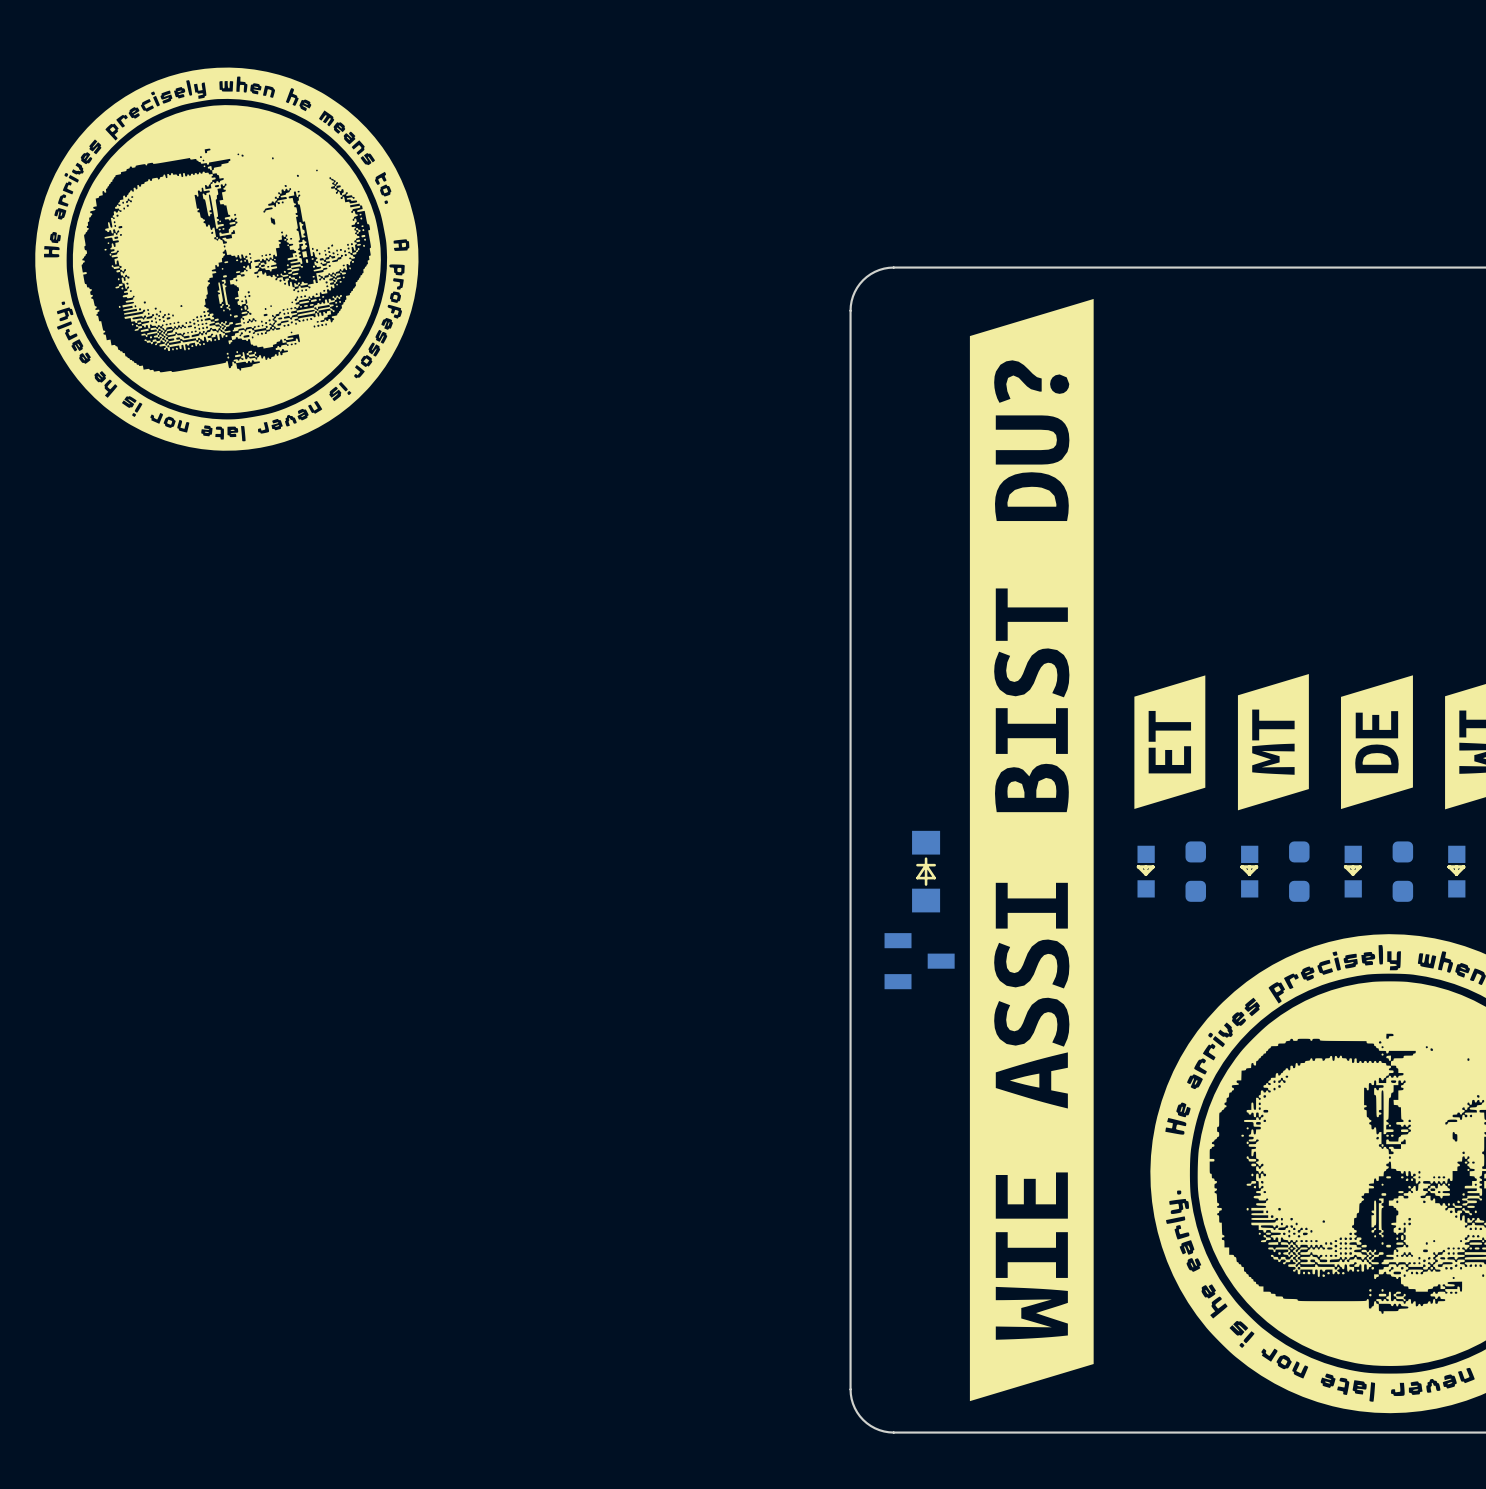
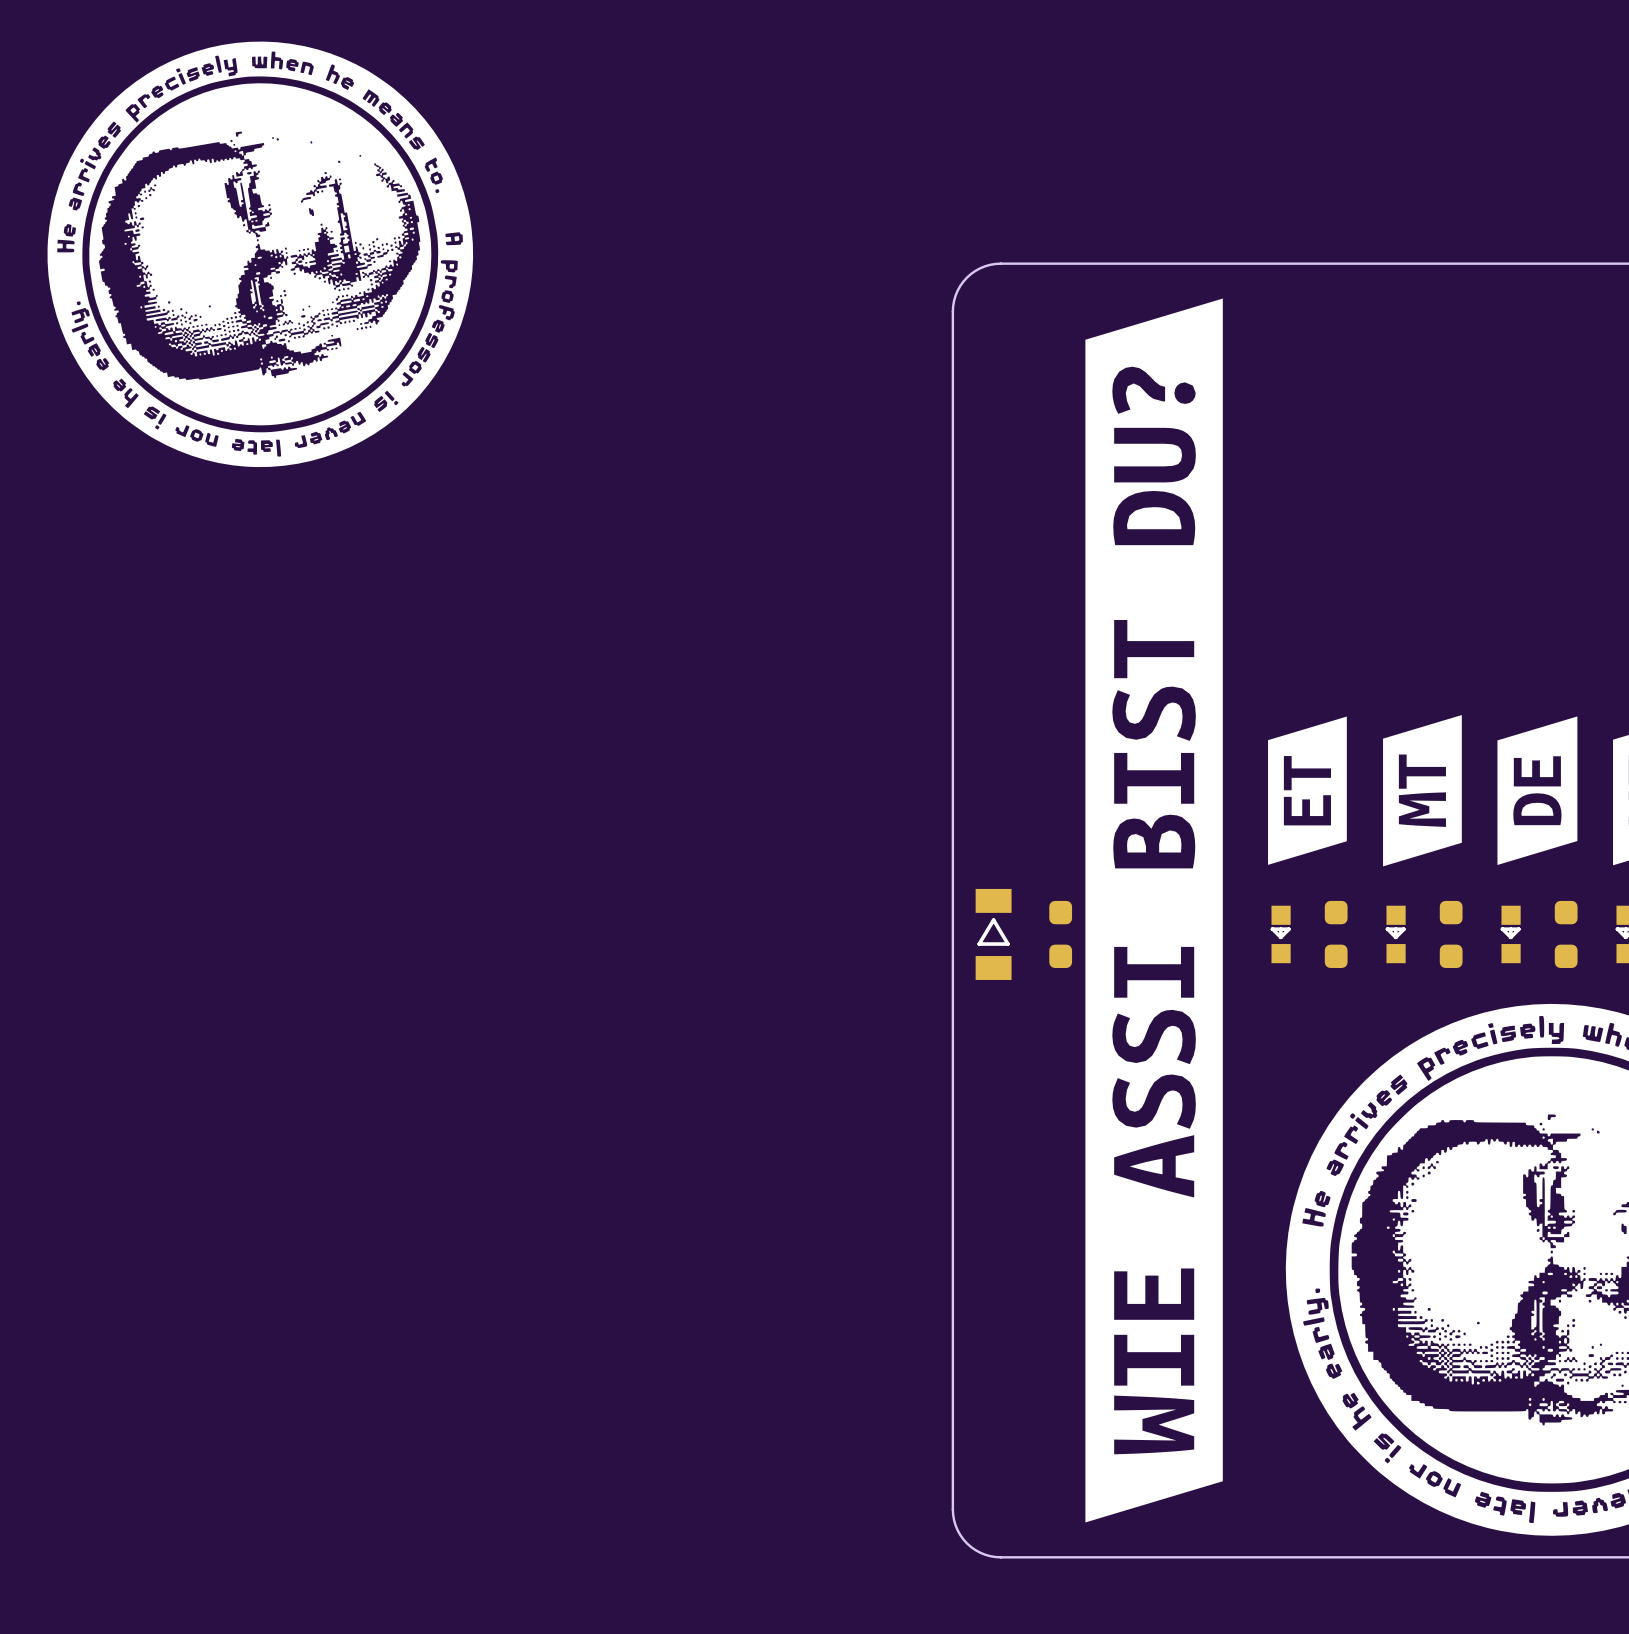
line: none -> (993, 920) (1007, 944) (979, 944) (993, 920)
part: none -> (993, 934)
part: (926, 871) -> none
part: none -> (1060, 934)
part: (919, 961) -> none

